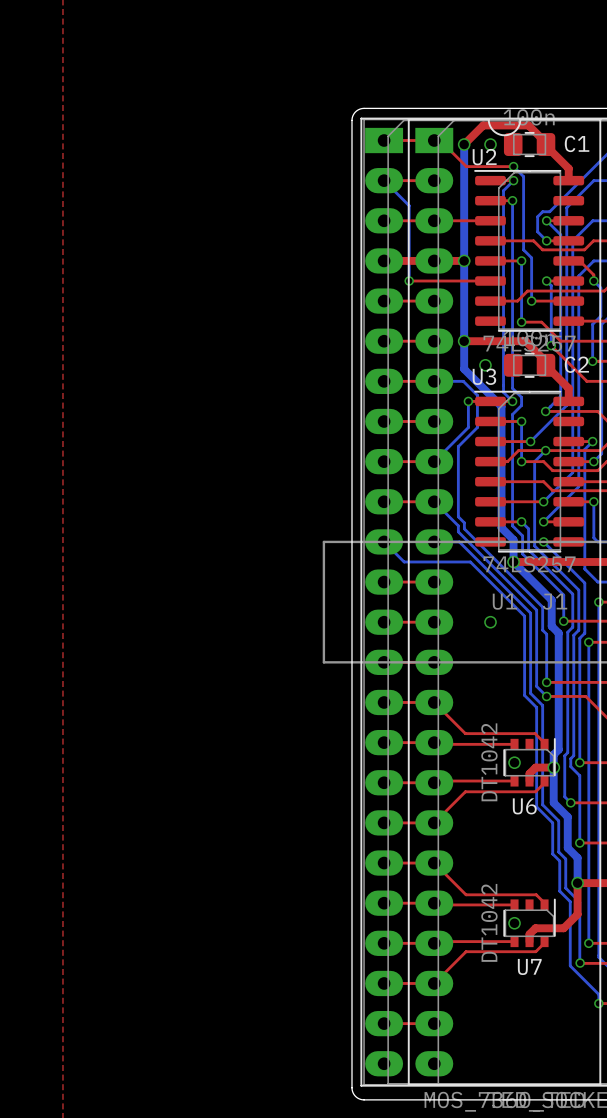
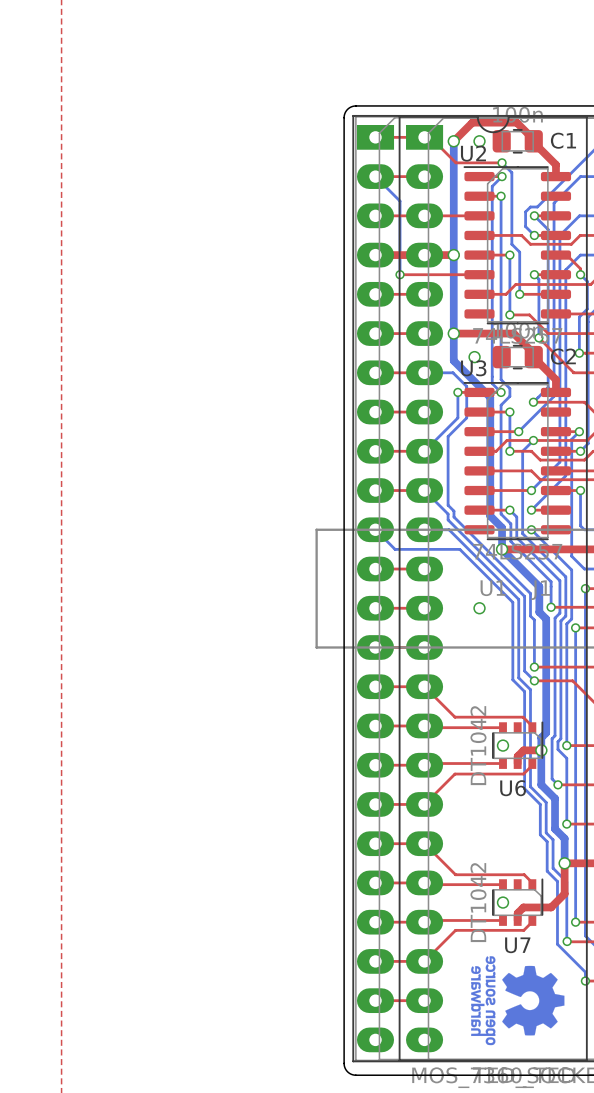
drawing: none -> [471, 956, 565, 1046]

